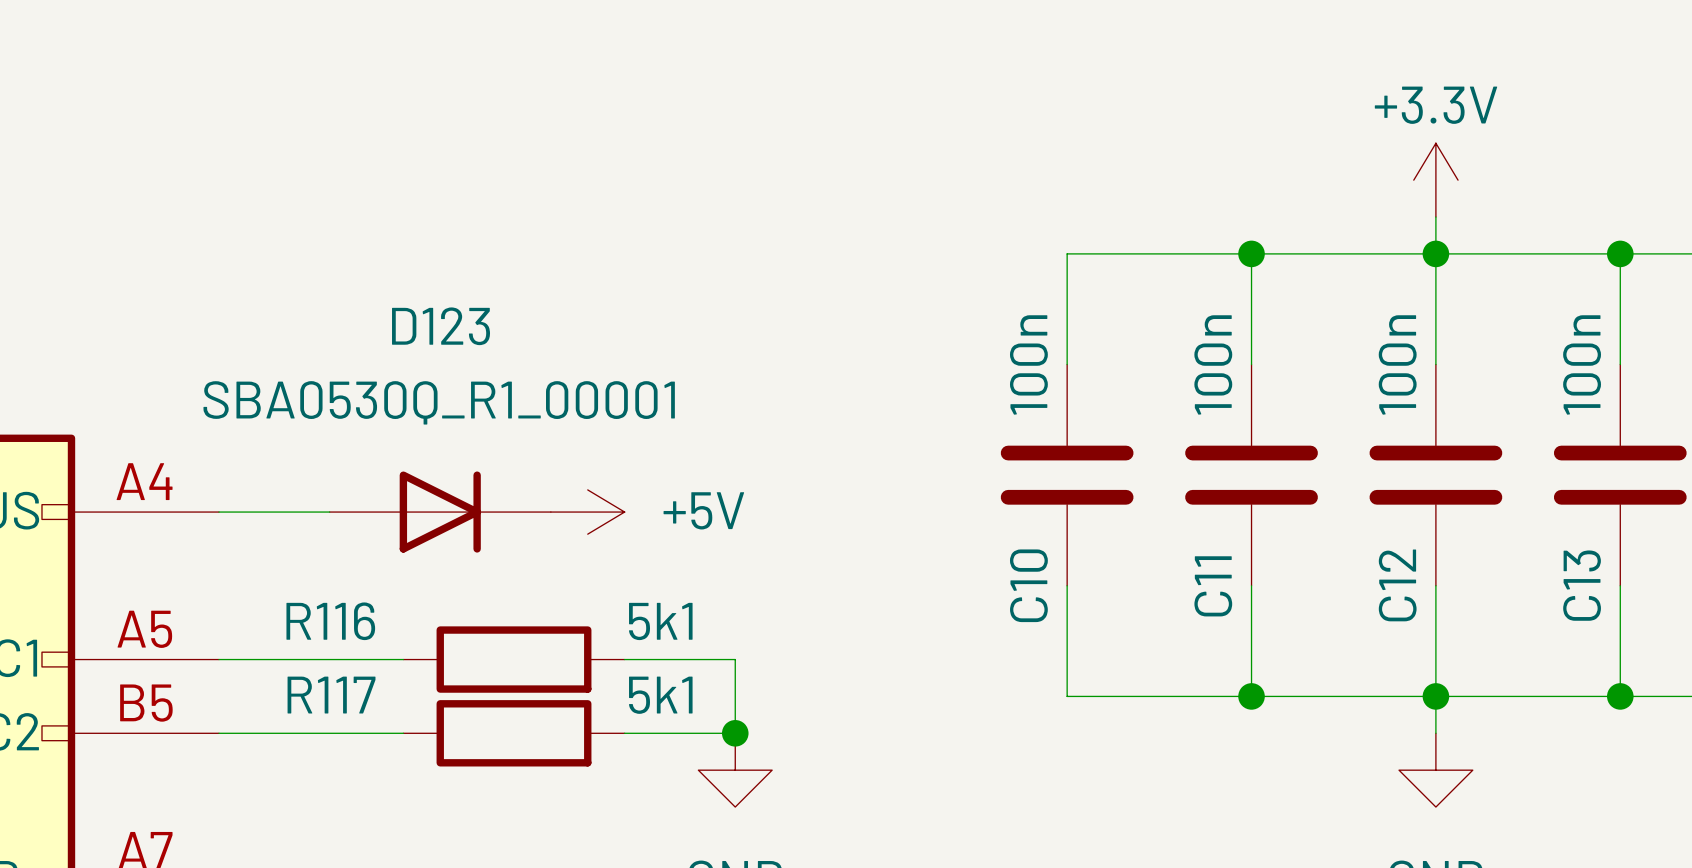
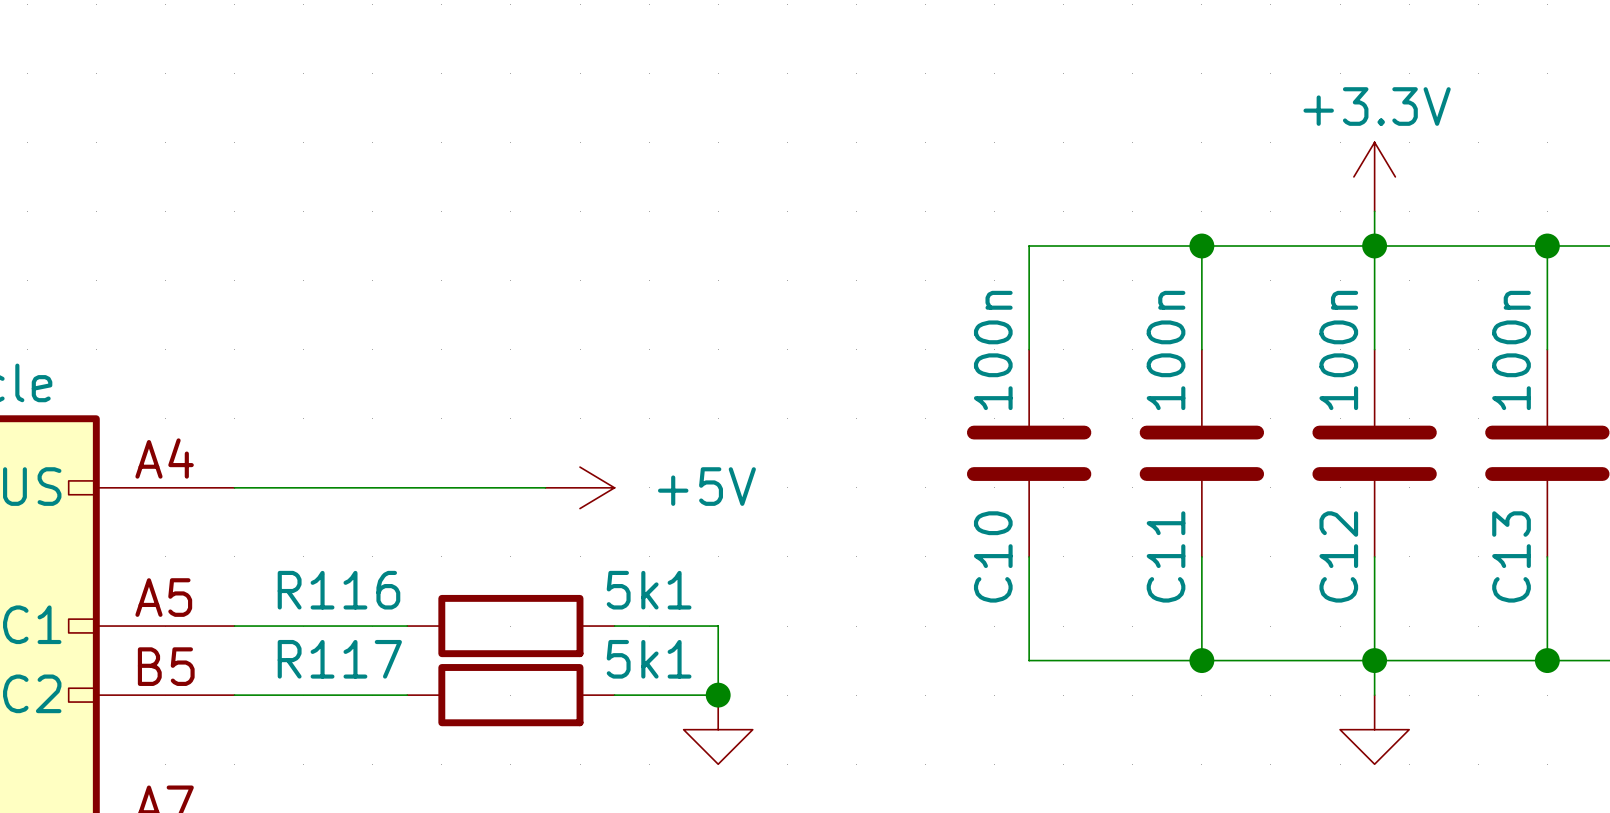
D123: SBA0530Q_R1_00001 (440, 512) -> none

